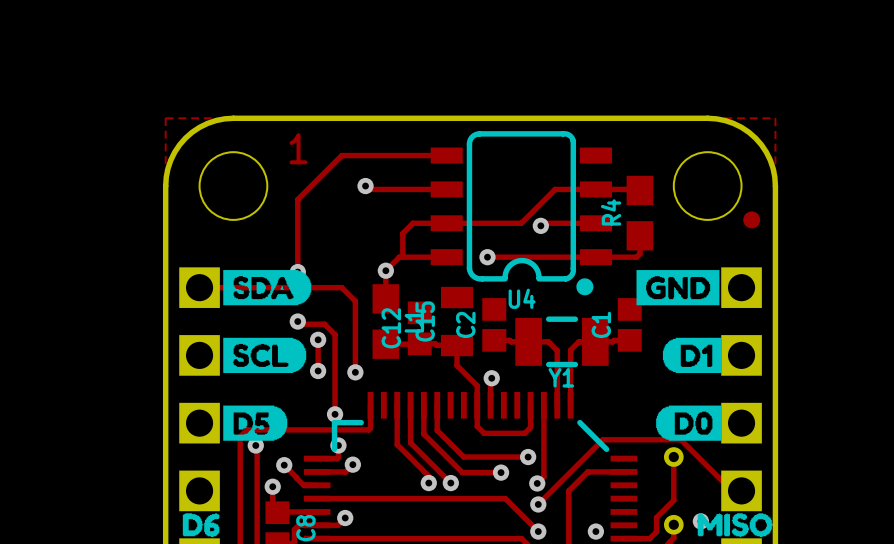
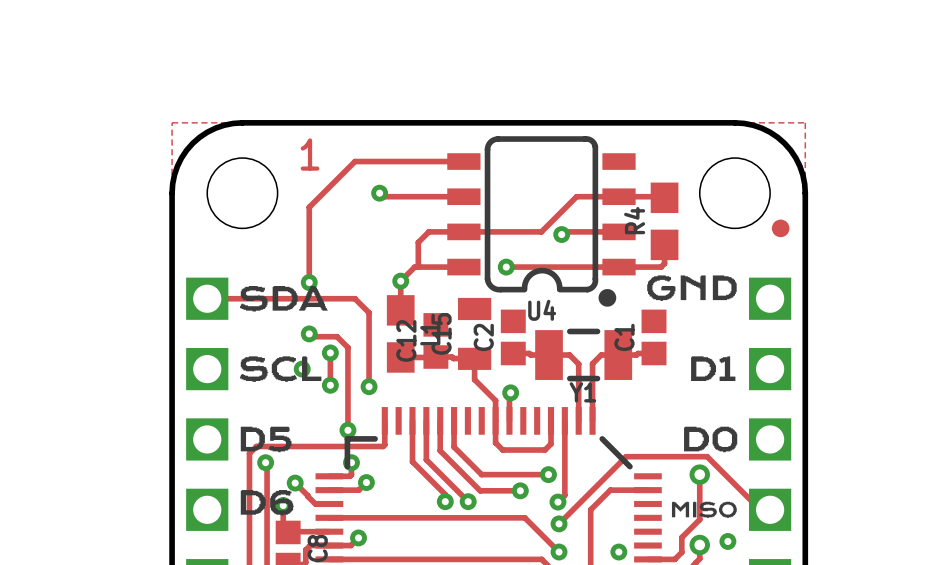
drawing shape: [223, 270, 312, 306] -> [239, 285, 328, 312]
drawing shape: [636, 270, 720, 306] -> [647, 275, 737, 301]
drawing shape: [223, 337, 307, 374] -> [239, 356, 322, 382]
drawing shape: [662, 337, 722, 374] -> [691, 356, 736, 382]
drawing shape: [223, 405, 288, 441] -> [240, 426, 292, 453]
drawing shape: [656, 405, 722, 441] -> [684, 426, 738, 453]
drawing: none -> [240, 490, 294, 516]
drawing: none -> [671, 501, 737, 518]
drawing: [182, 513, 220, 538] -> none
drawing: [697, 513, 773, 538] -> none

